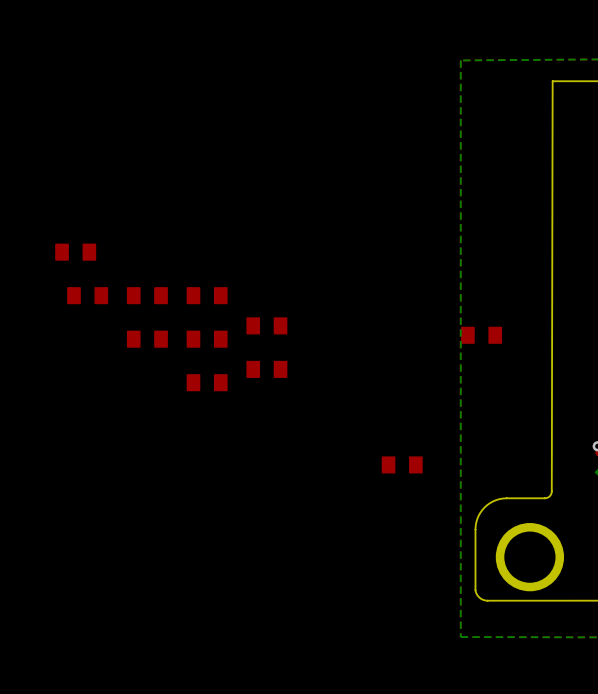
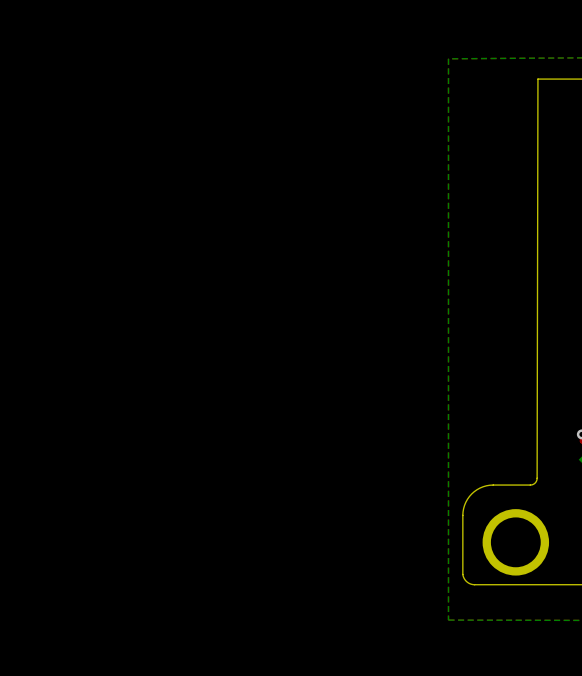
part: (75, 252) -> none
part: (87, 295) -> none
part: (147, 295) -> none
part: (207, 295) -> none
part: (266, 325) -> none
part: (481, 335) -> none
part: (147, 339) -> none
part: (207, 339) -> none
part: (266, 369) -> none
part: (207, 382) -> none
part: (402, 464) -> none

